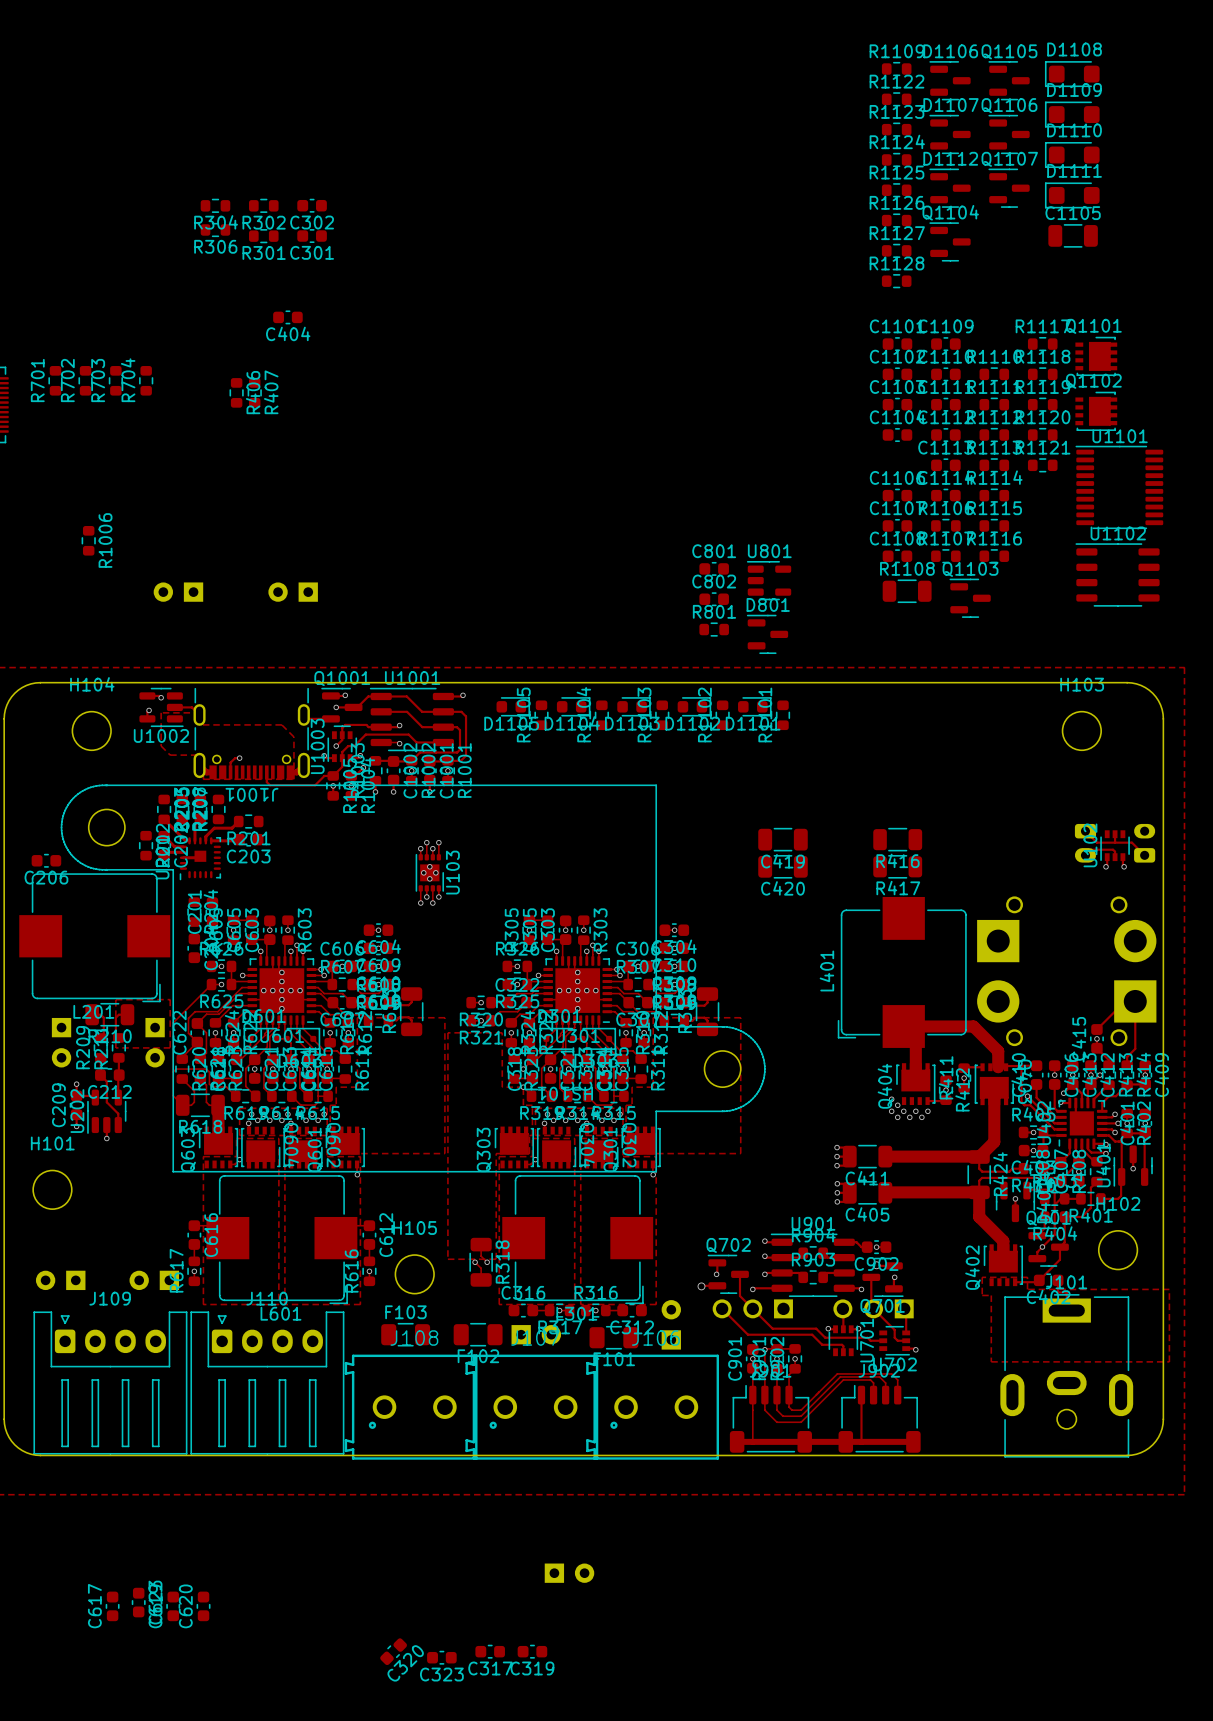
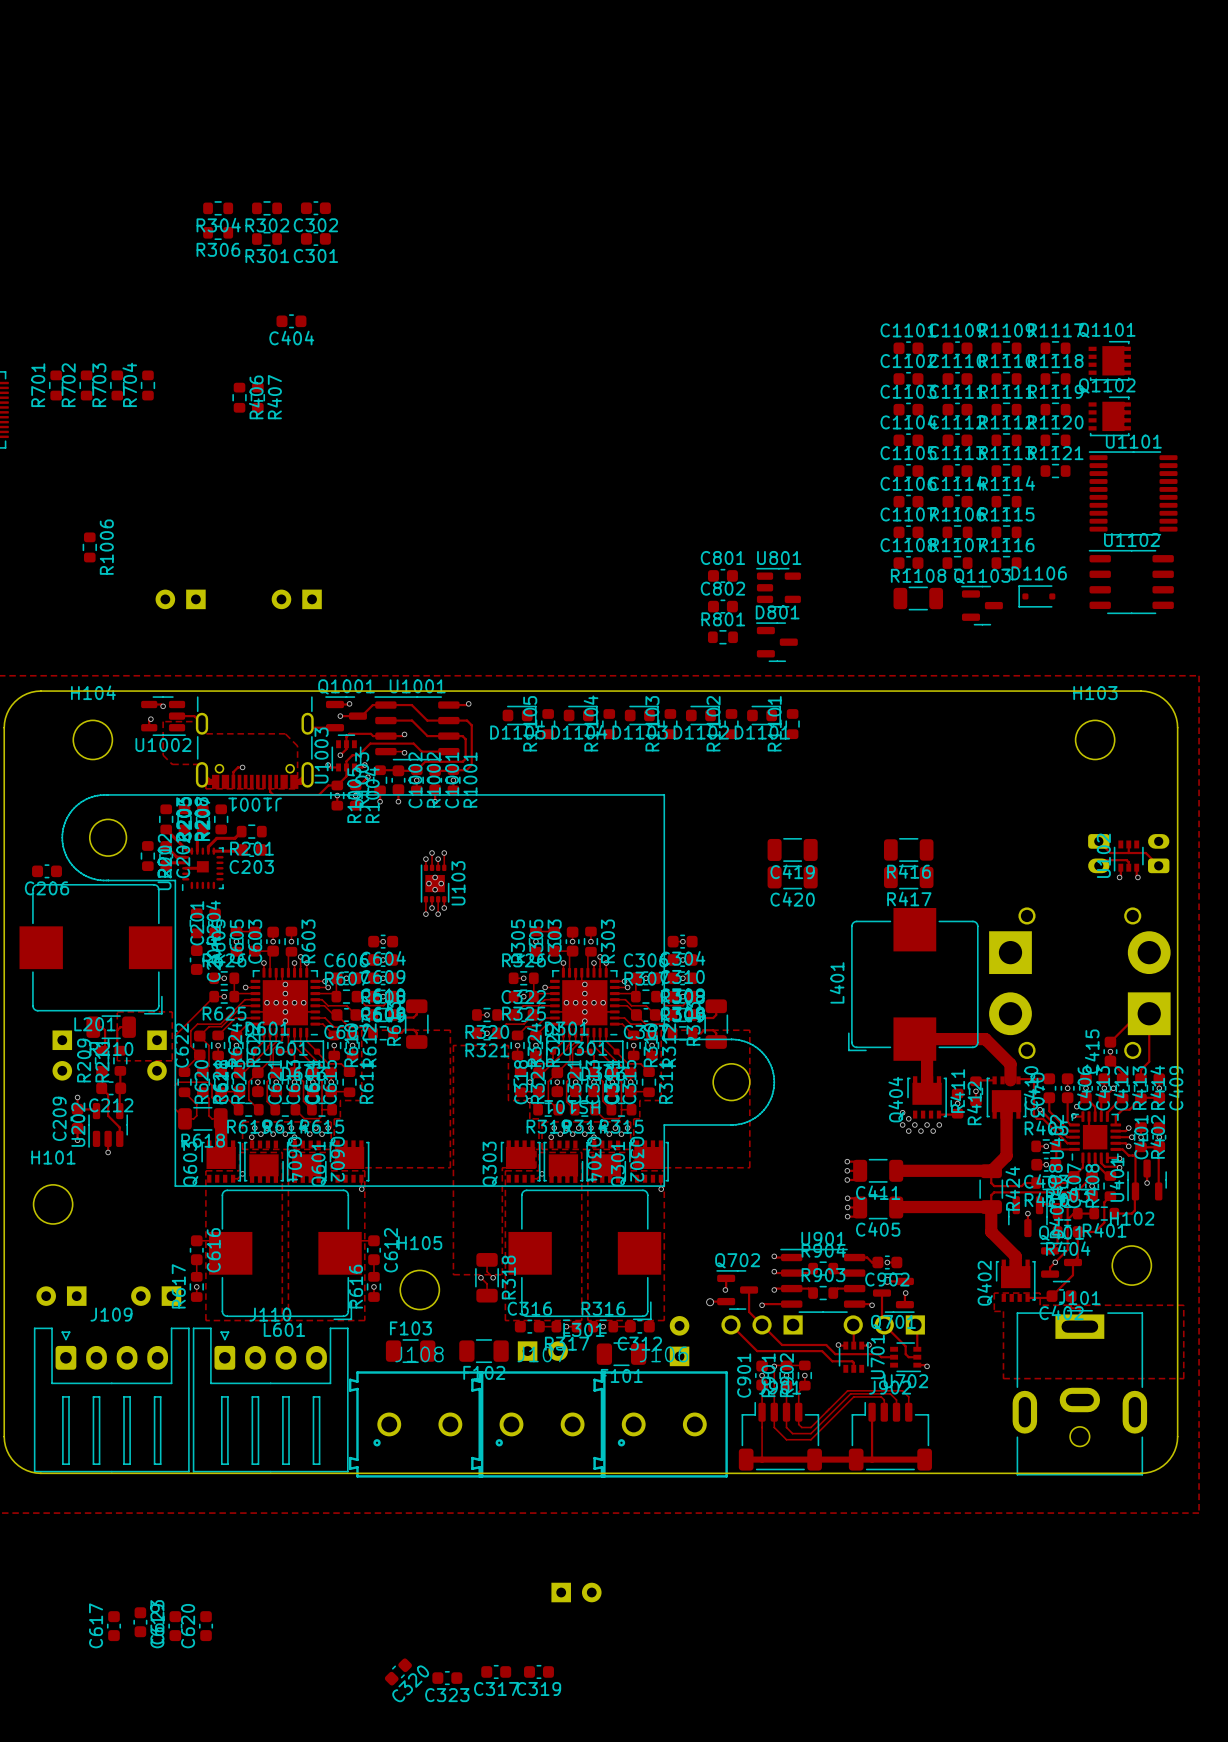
D1106 footprint: [929, 61, 971, 101] -> [1018, 585, 1056, 608]
R1109 position: (896, 69) -> (1006, 348)
D1108: (1072, 74) -> none
Q1105: (1009, 80) -> none
R1122: (896, 99) -> none
D1109: (1072, 114) -> none
R1123: (896, 129) -> none
D1107: (950, 134) -> none
Q1106: (1009, 134) -> none
D1110: (1072, 155) -> none
R1124: (896, 159) -> none
D1112: (950, 188) -> none
Q1107: (1009, 188) -> none
R1125: (896, 190) -> none
D1111: (1072, 195) -> none
R1126: (896, 220) -> none
C1105 footprint: [1048, 224, 1098, 248] -> [893, 464, 924, 479]
Q1104: (950, 241) -> none
R1127: (896, 250) -> none
R1128: (896, 281) -> none

